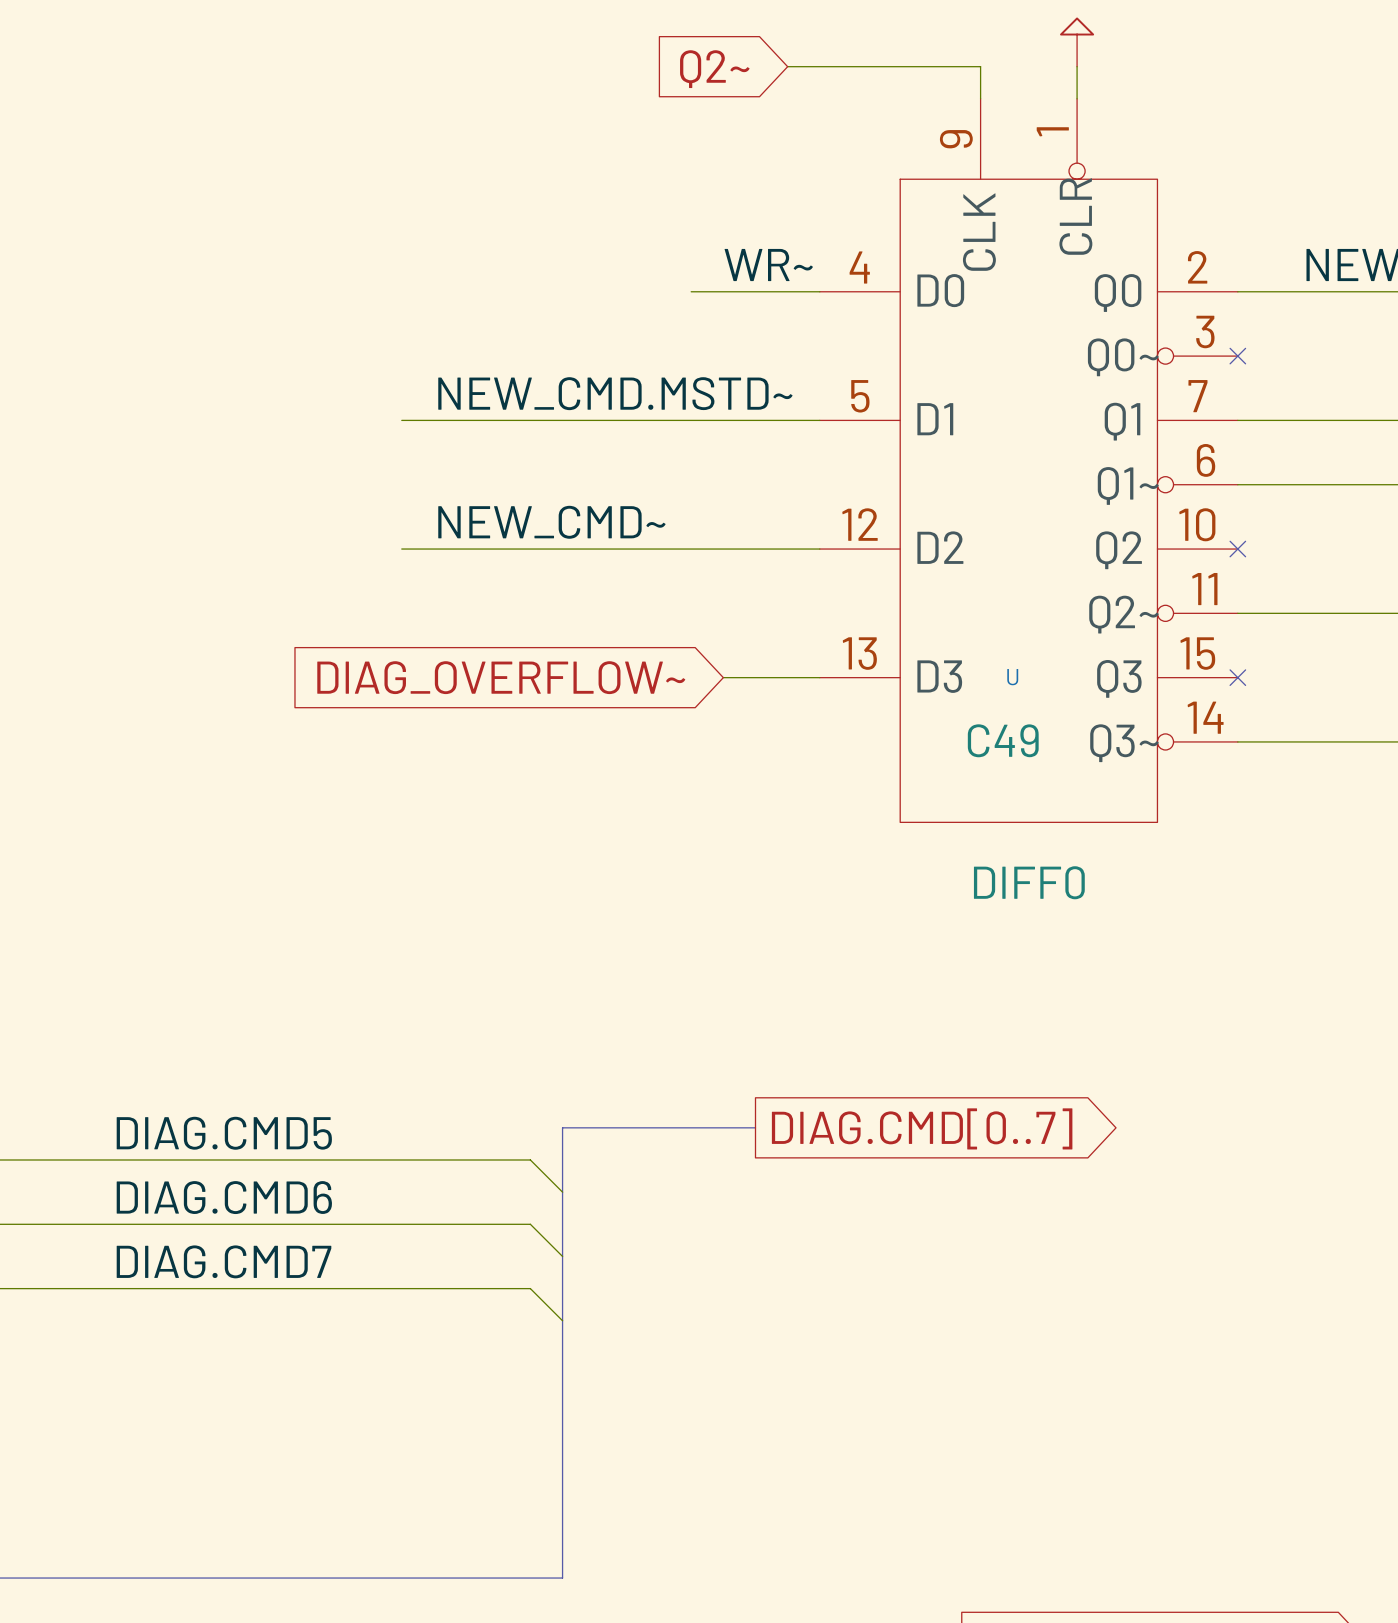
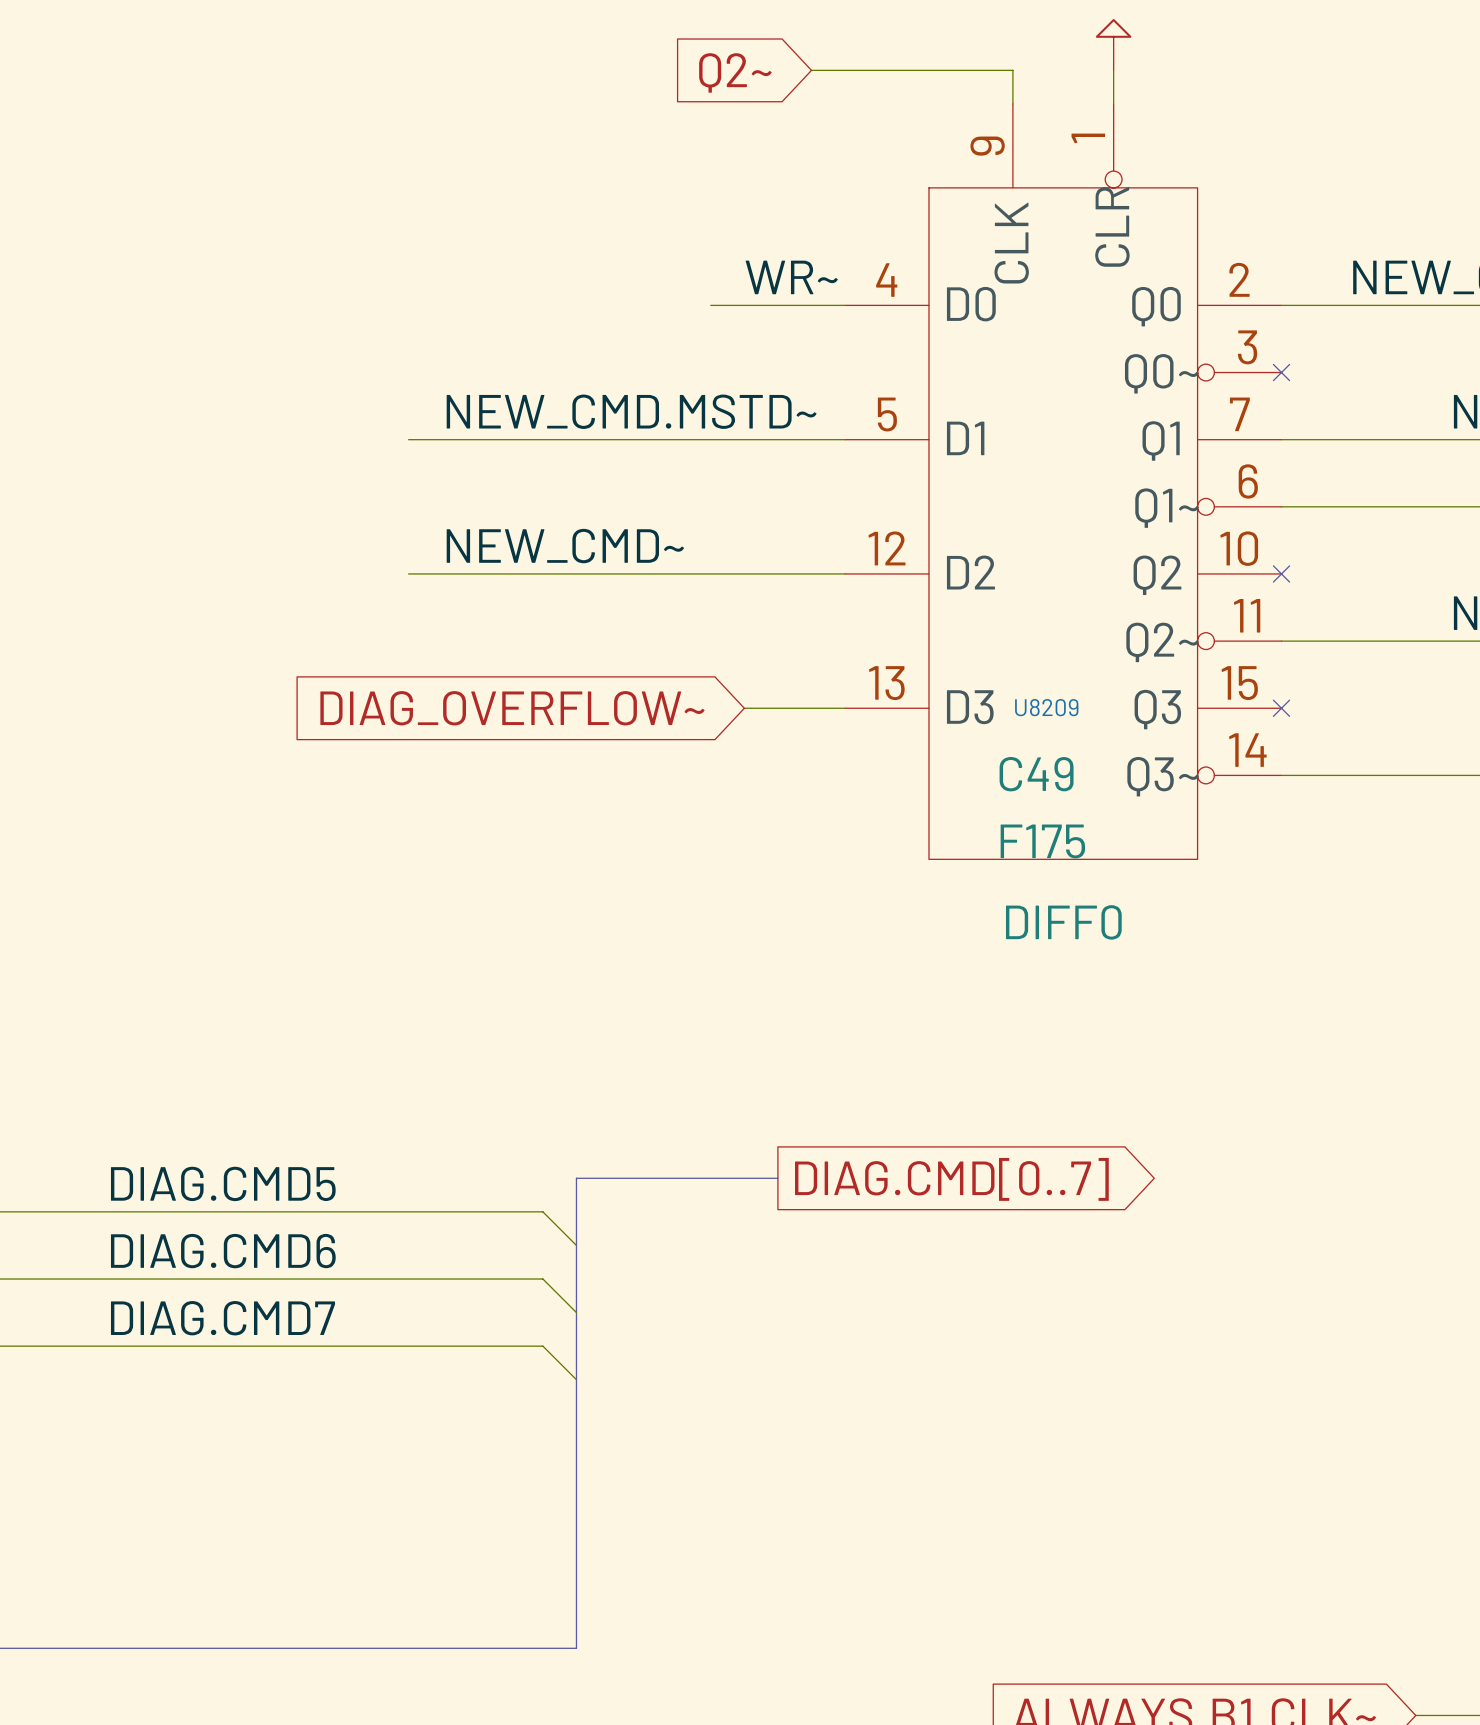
U name: U (1012, 677) -> U8209 (1046, 707)
U value: none -> F175 (1042, 841)

